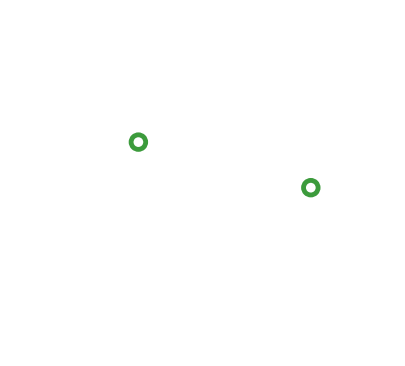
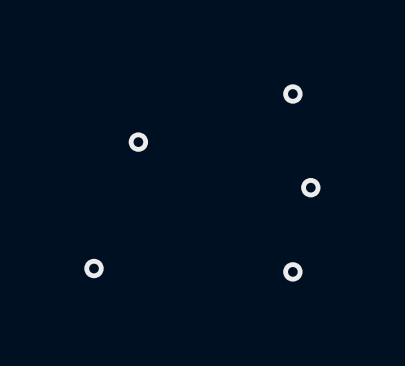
via: none -> (292, 93)
via: none -> (93, 268)
via: none -> (292, 271)

